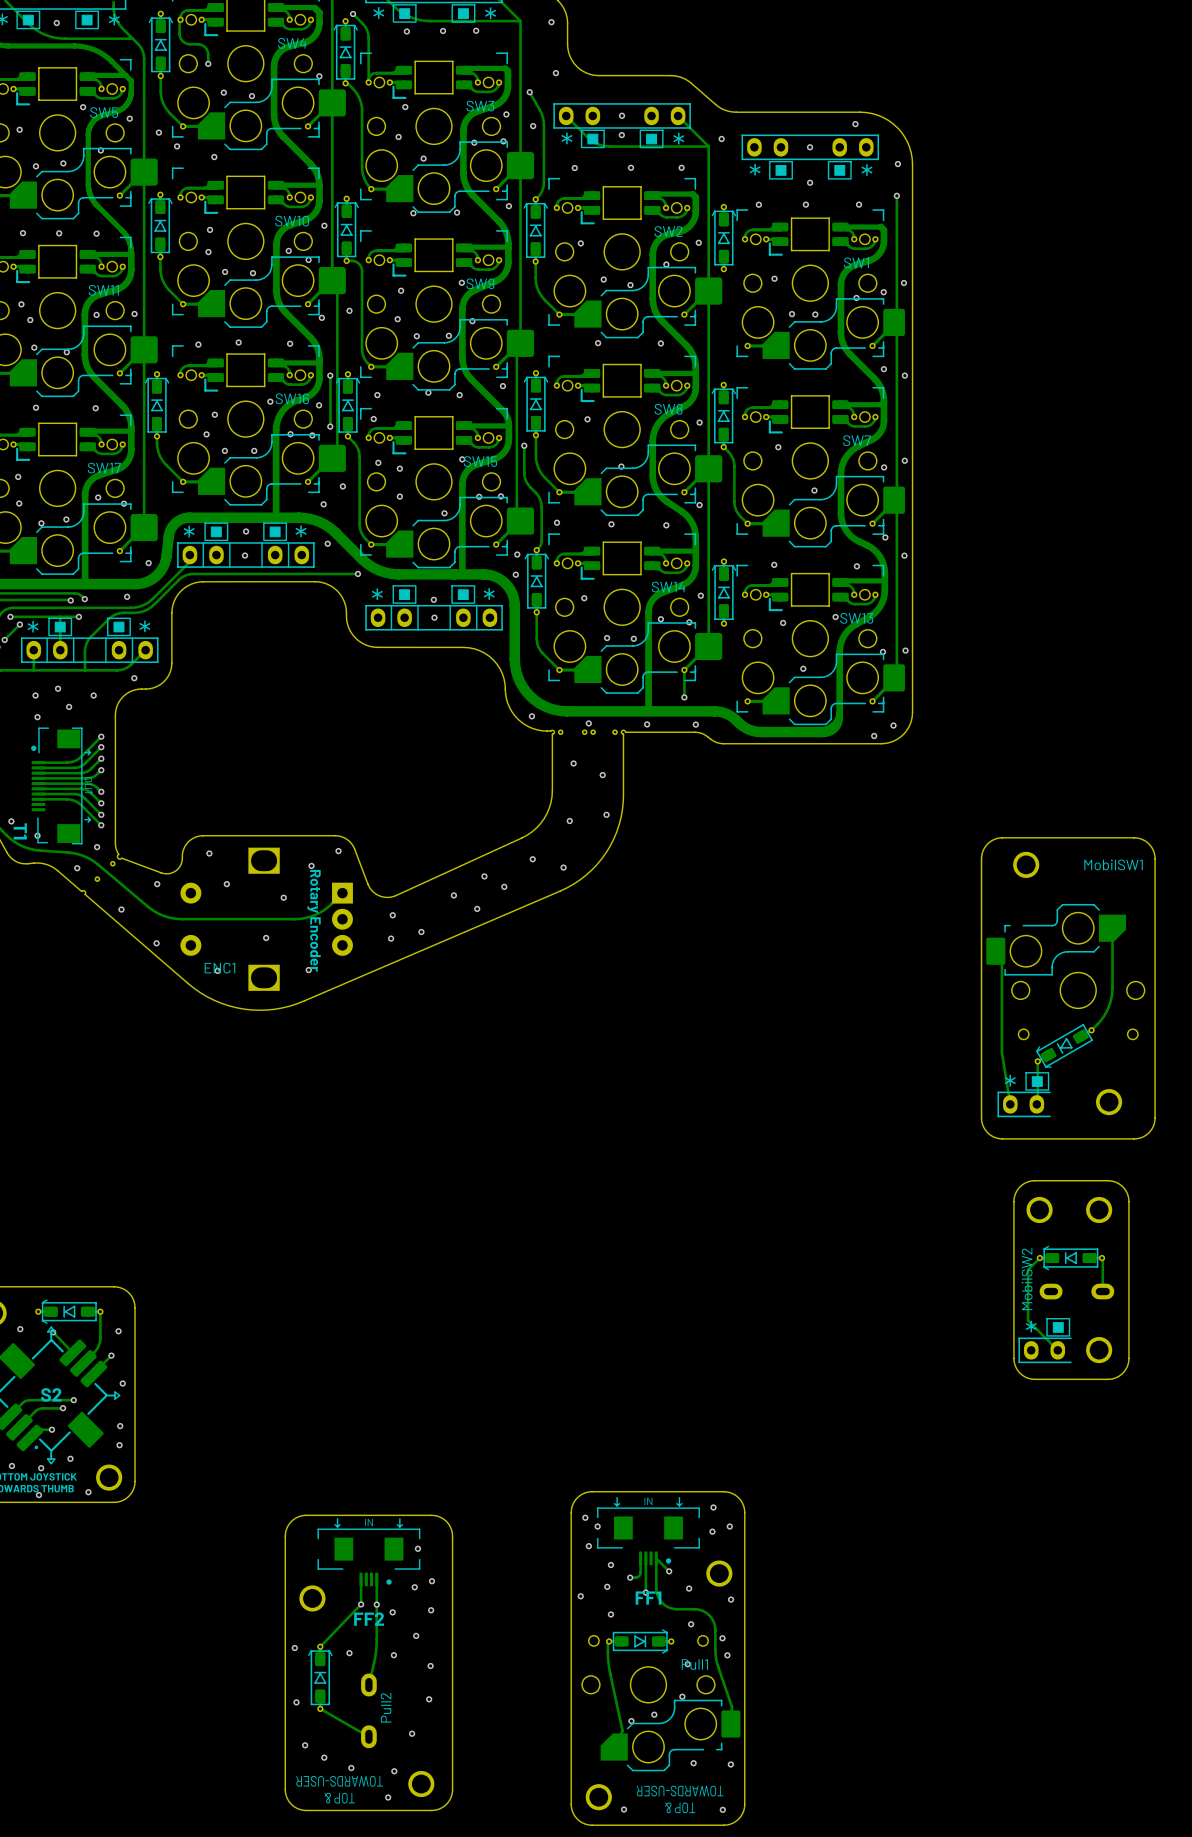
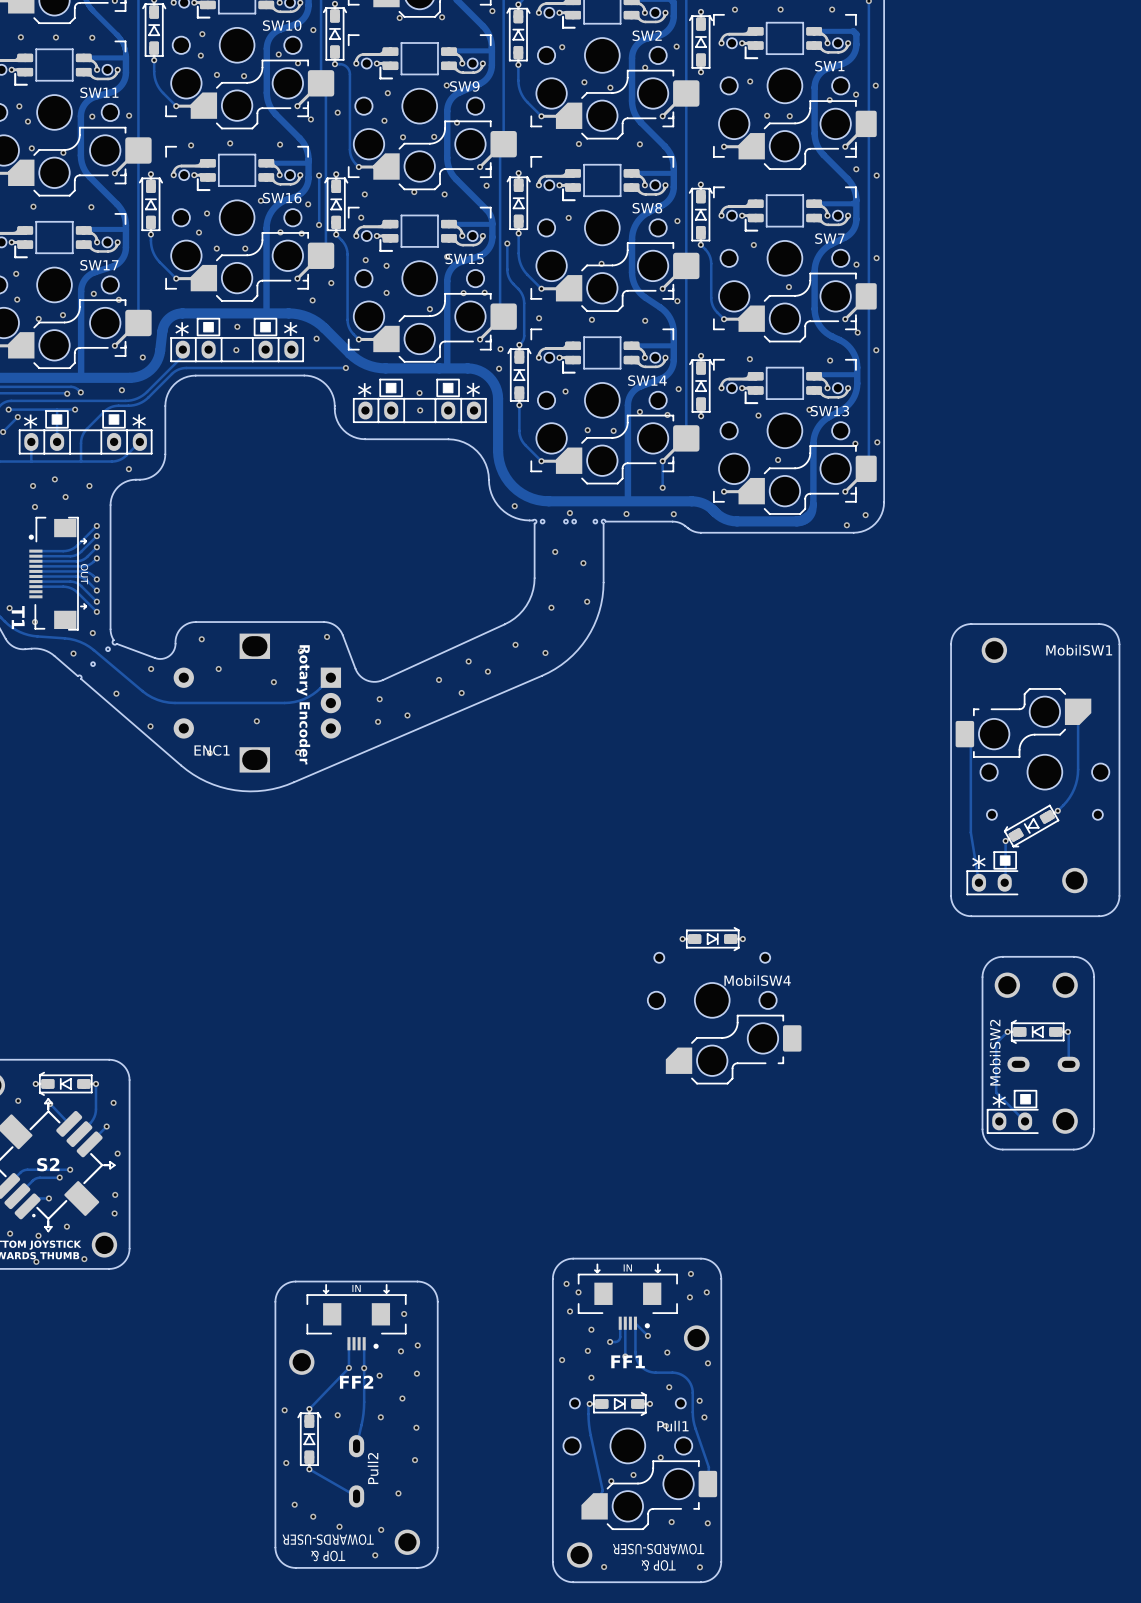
part: none -> (712, 939)
MobilSW4: none -> (724, 1018)

